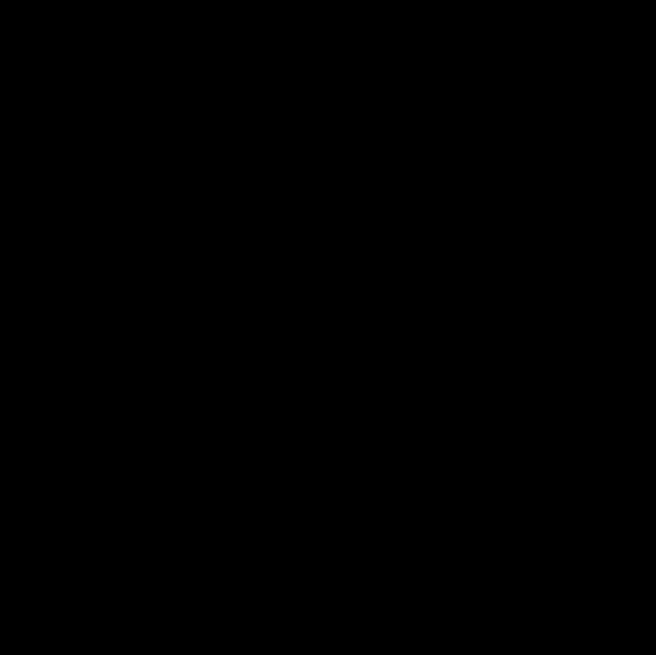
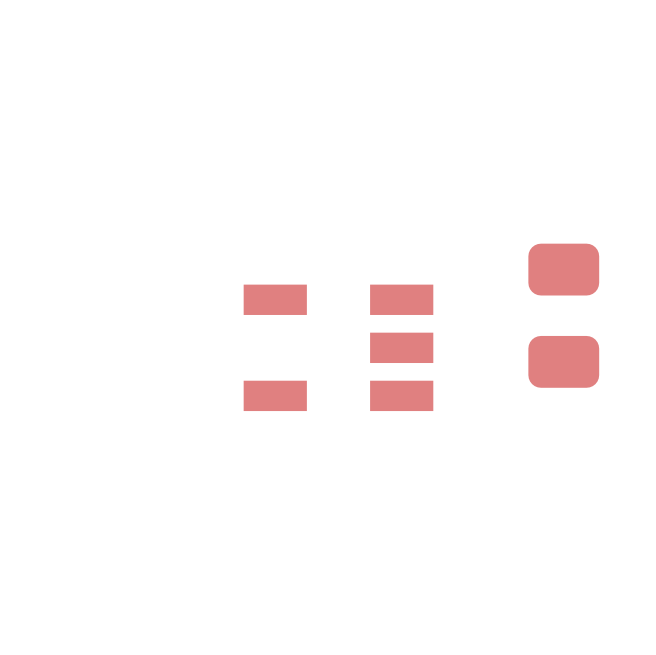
part: none -> (563, 315)
part: none -> (338, 347)

